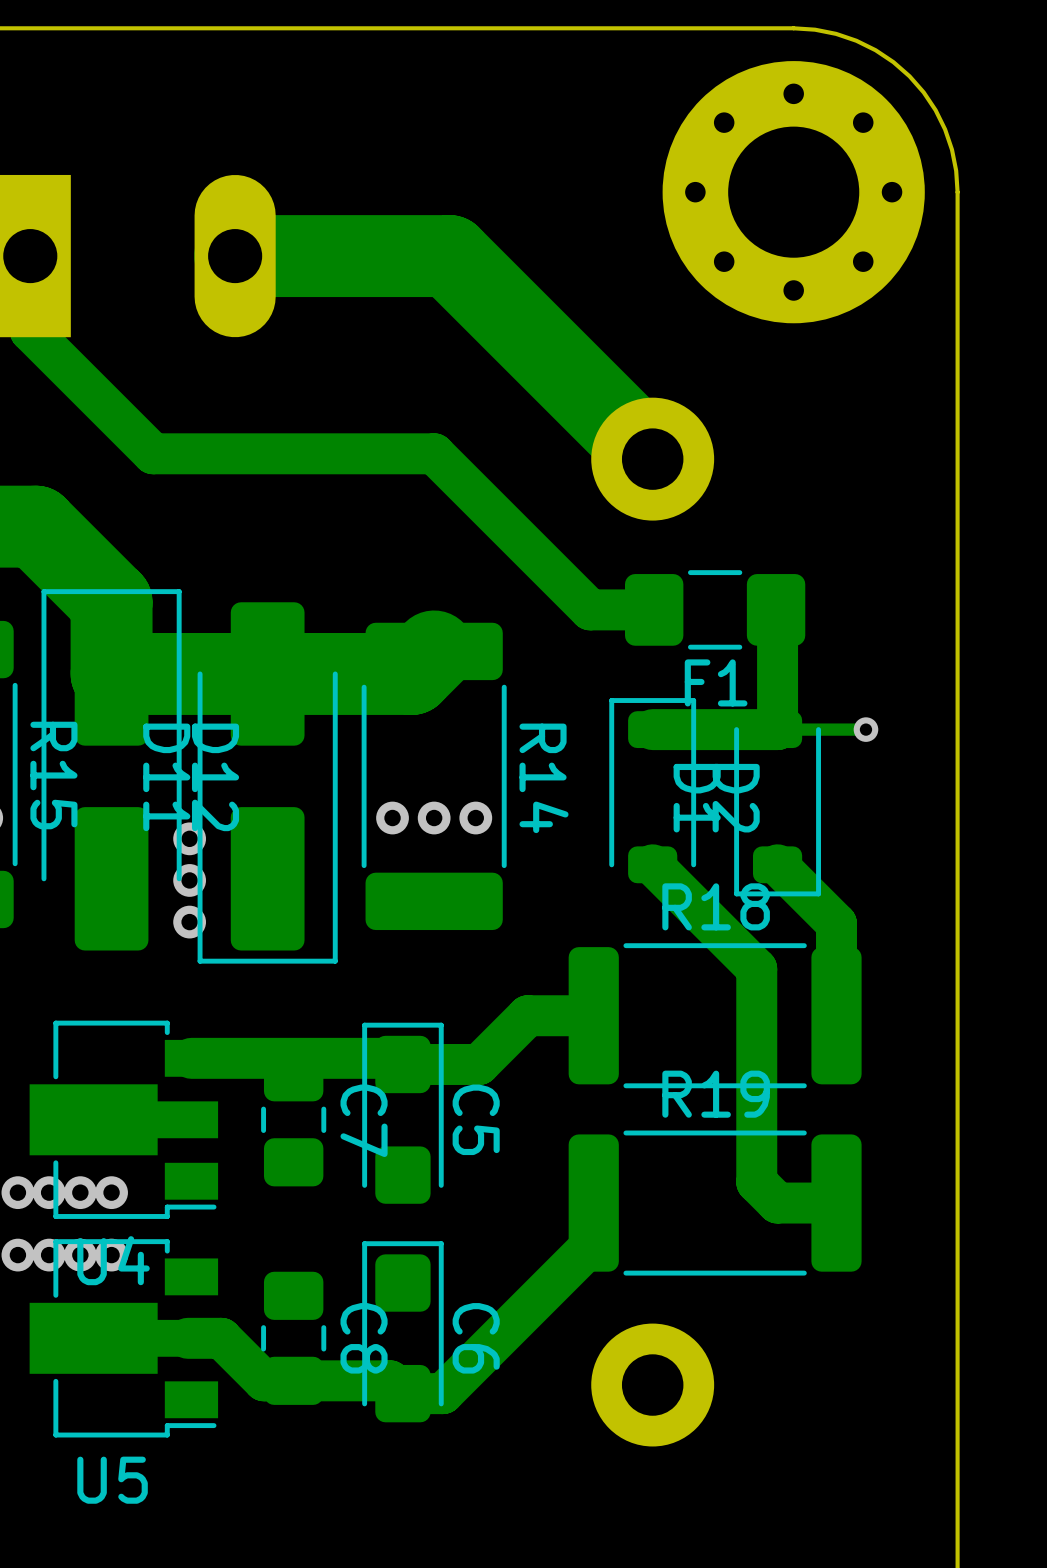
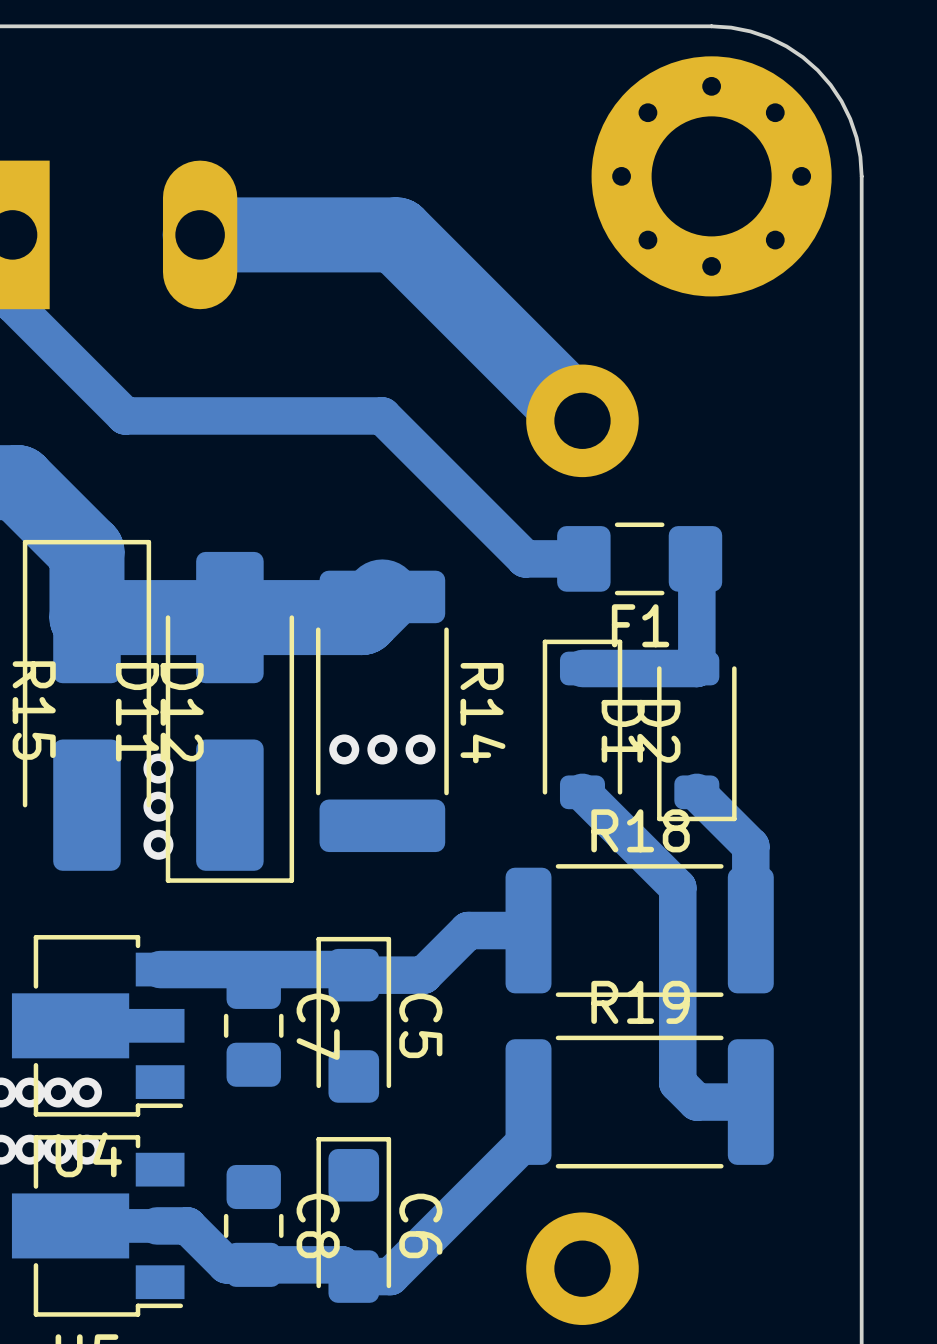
track: (865, 729) (777, 729) -> none
via: (865, 729) -> none

